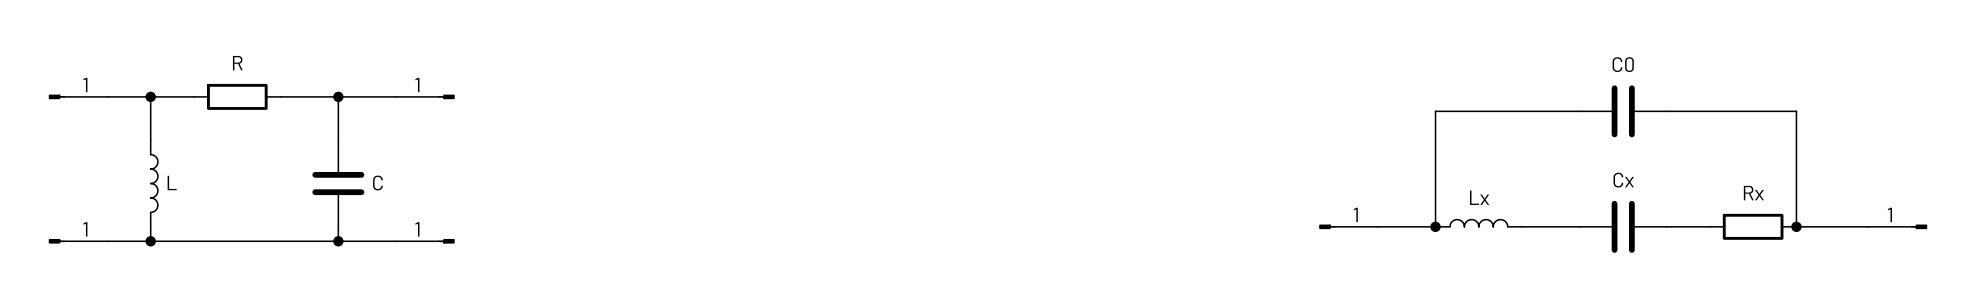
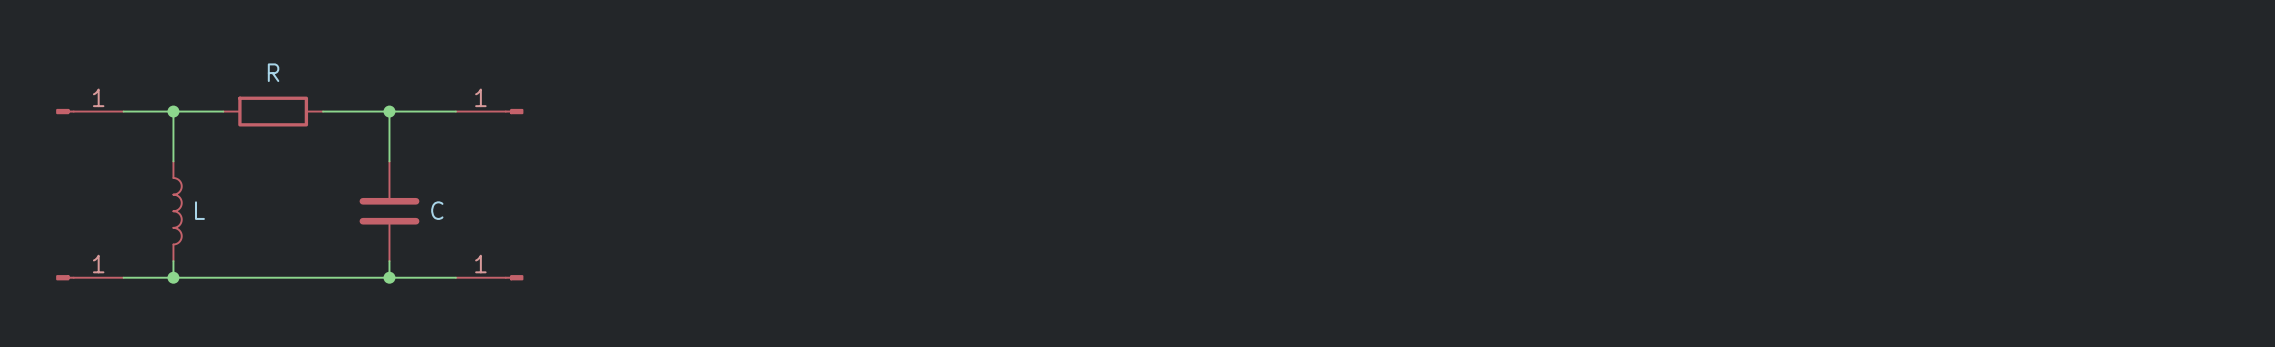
wire: (1579, 111) (1435, 111) (1435, 226) (1377, 226) -> none
part: C0 (1623, 111) -> none
wire: (1666, 111) (1796, 111) (1796, 226) (1868, 226) -> none
part: Lx (1478, 223) -> none
part: (1348, 226) -> none
junction: (1435, 226) -> none
wire: (1522, 226) (1579, 226) -> none
part: Cx (1623, 226) -> none
wire: (1666, 226) (1709, 226) -> none
part: Rx (1753, 226) -> none
junction: (1796, 226) -> none
part: (1897, 226) -> none

